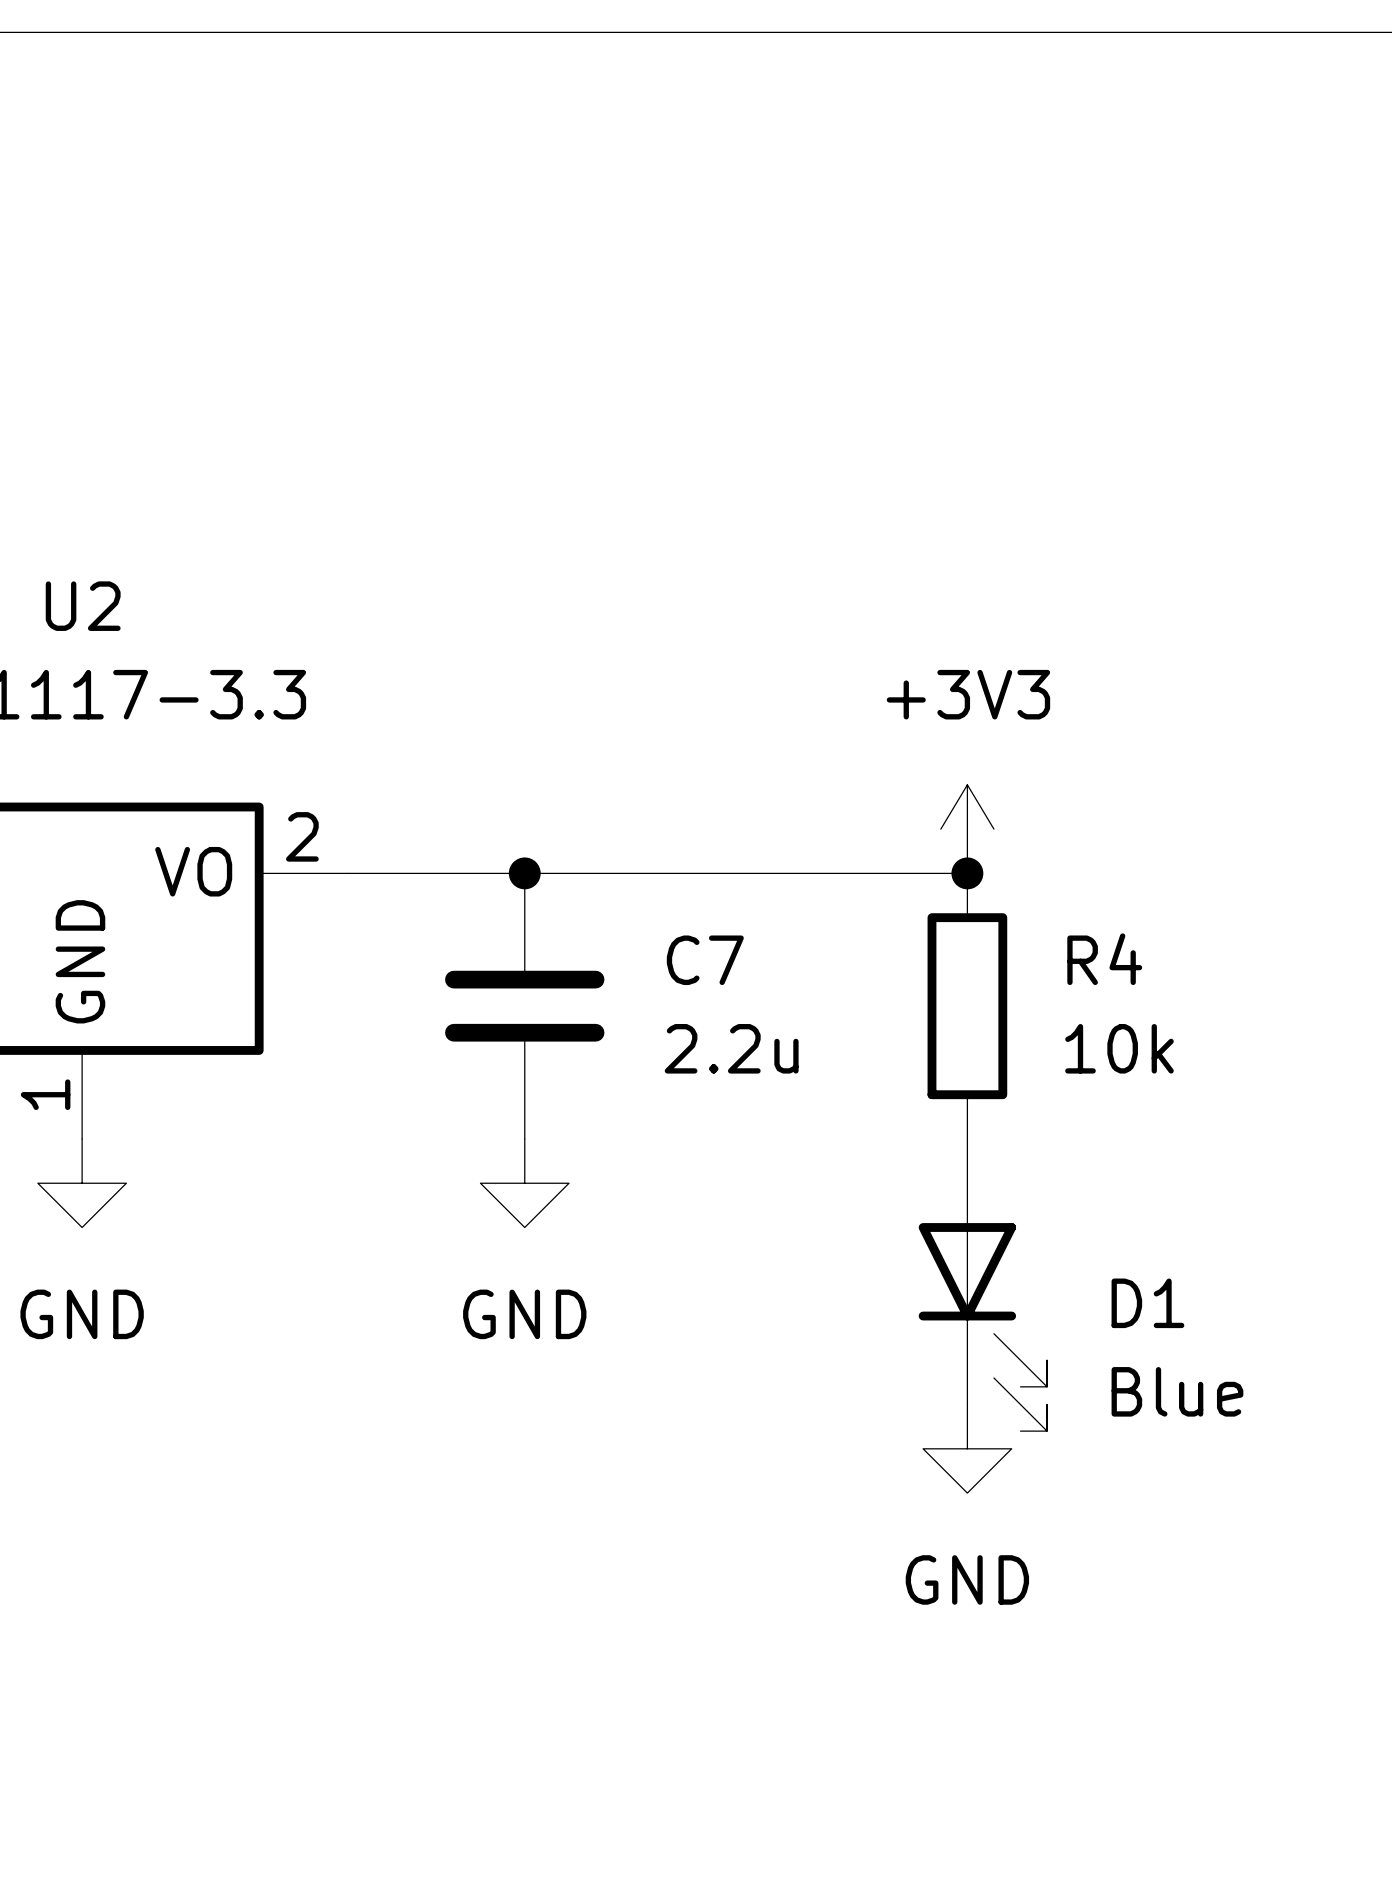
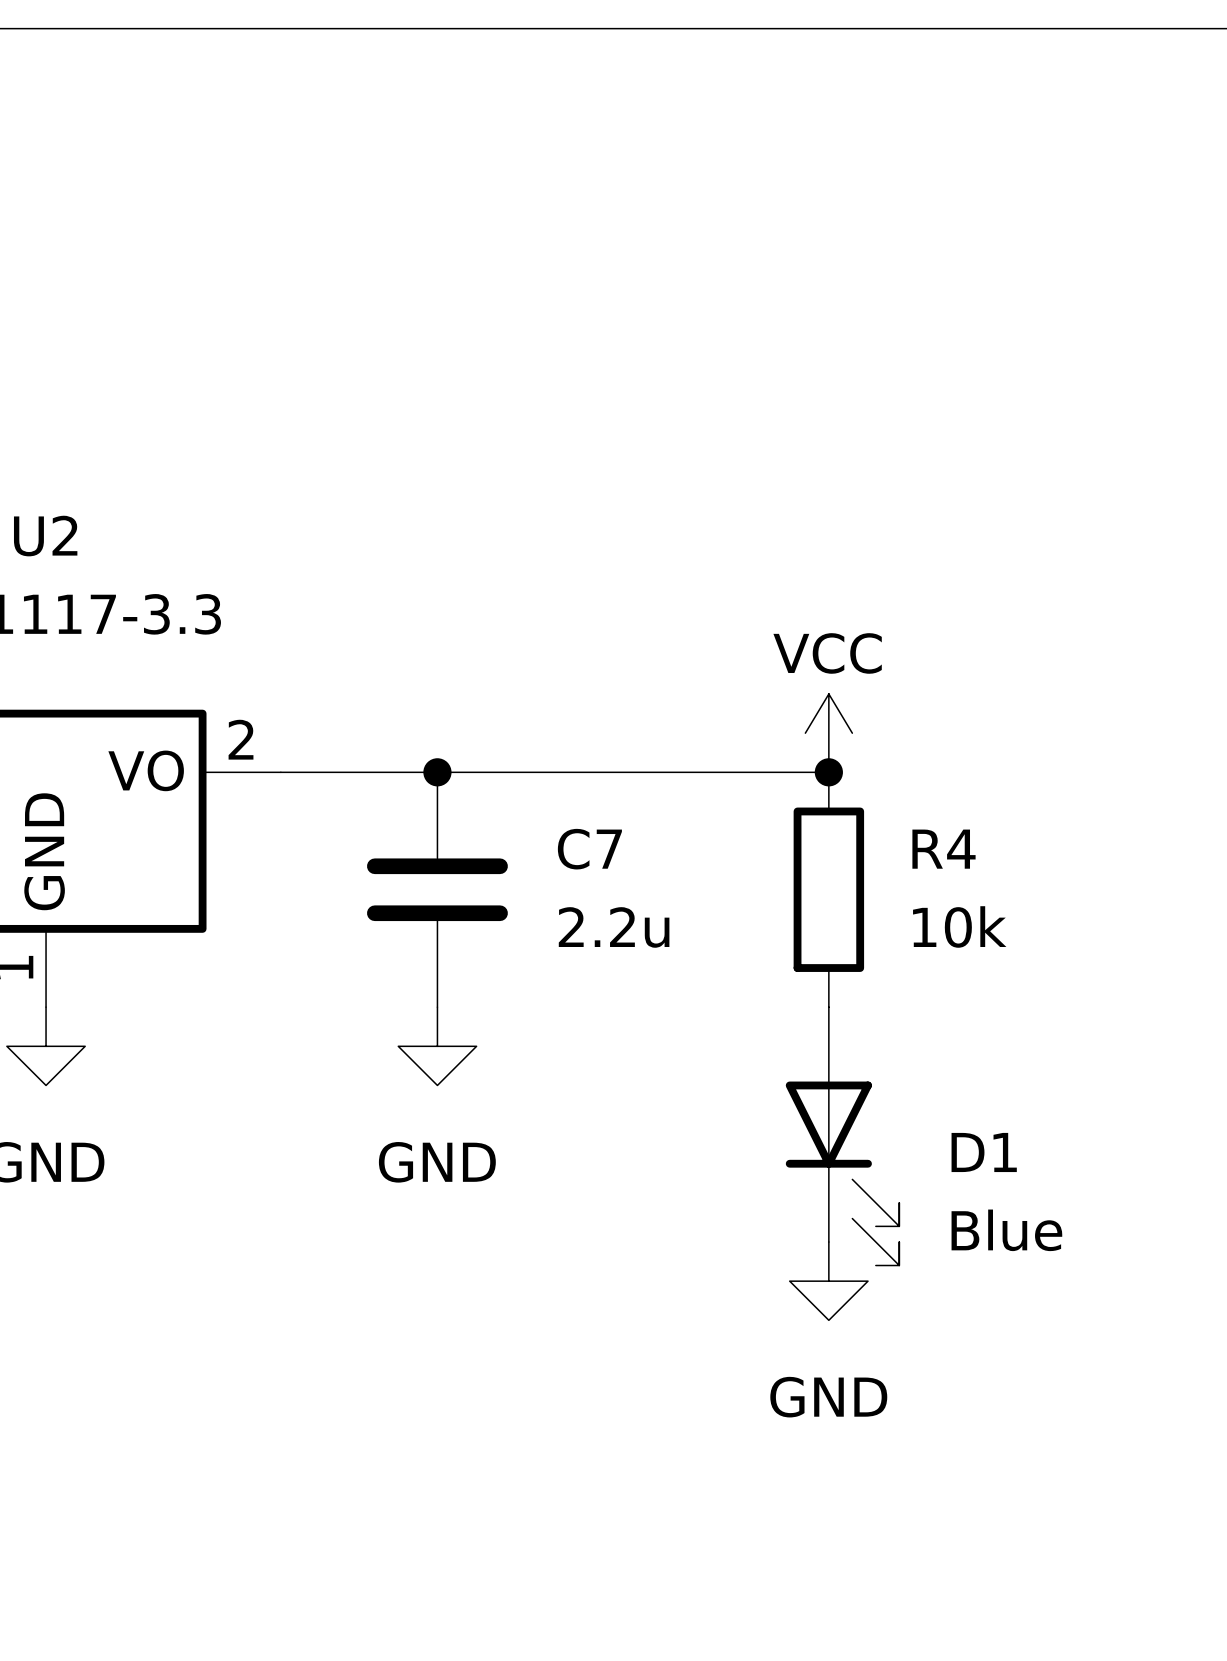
power symbol: +3V3 (967, 829) -> VCC (828, 733)

